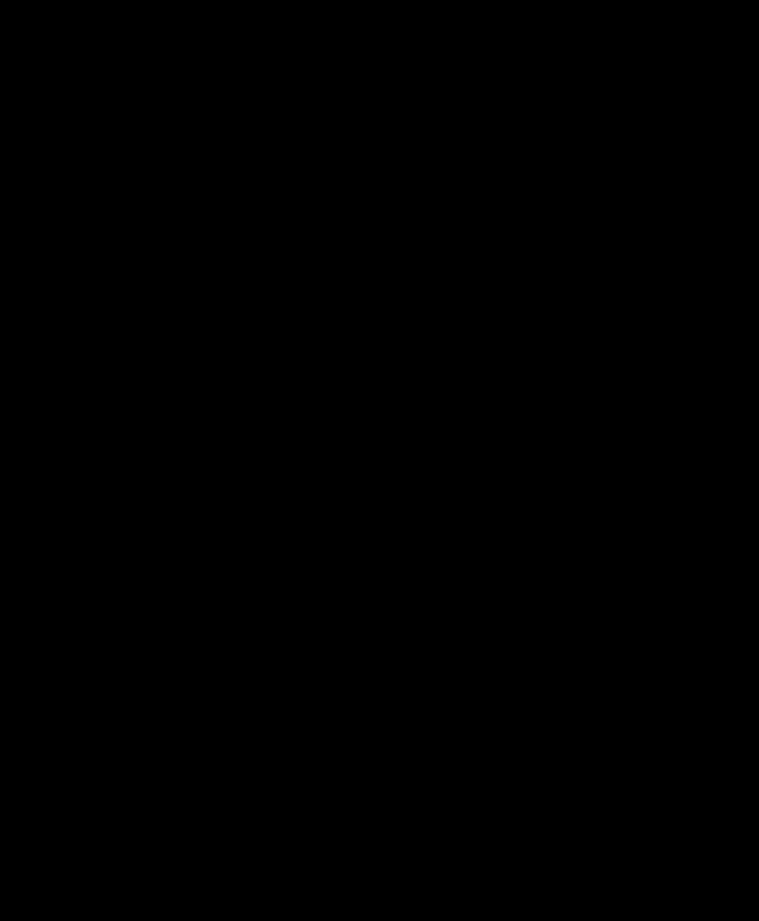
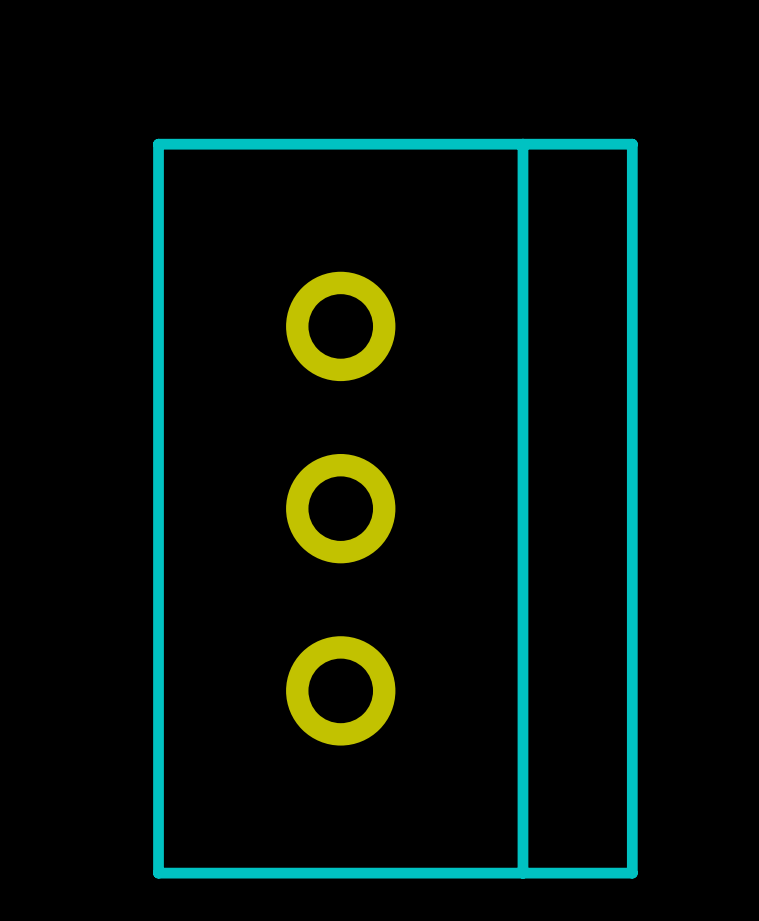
part: none -> (395, 508)

